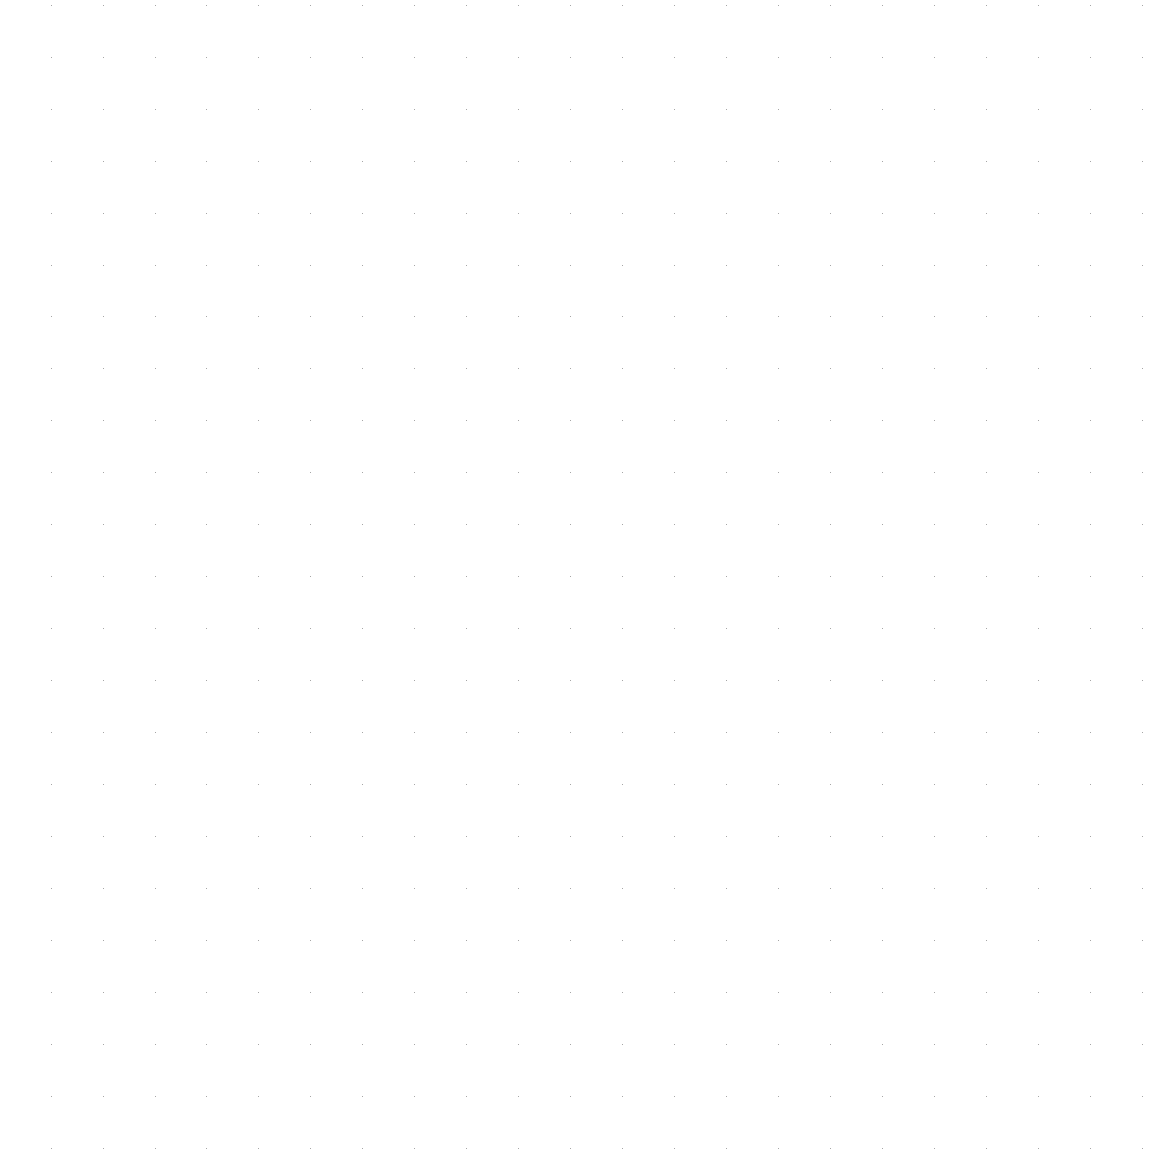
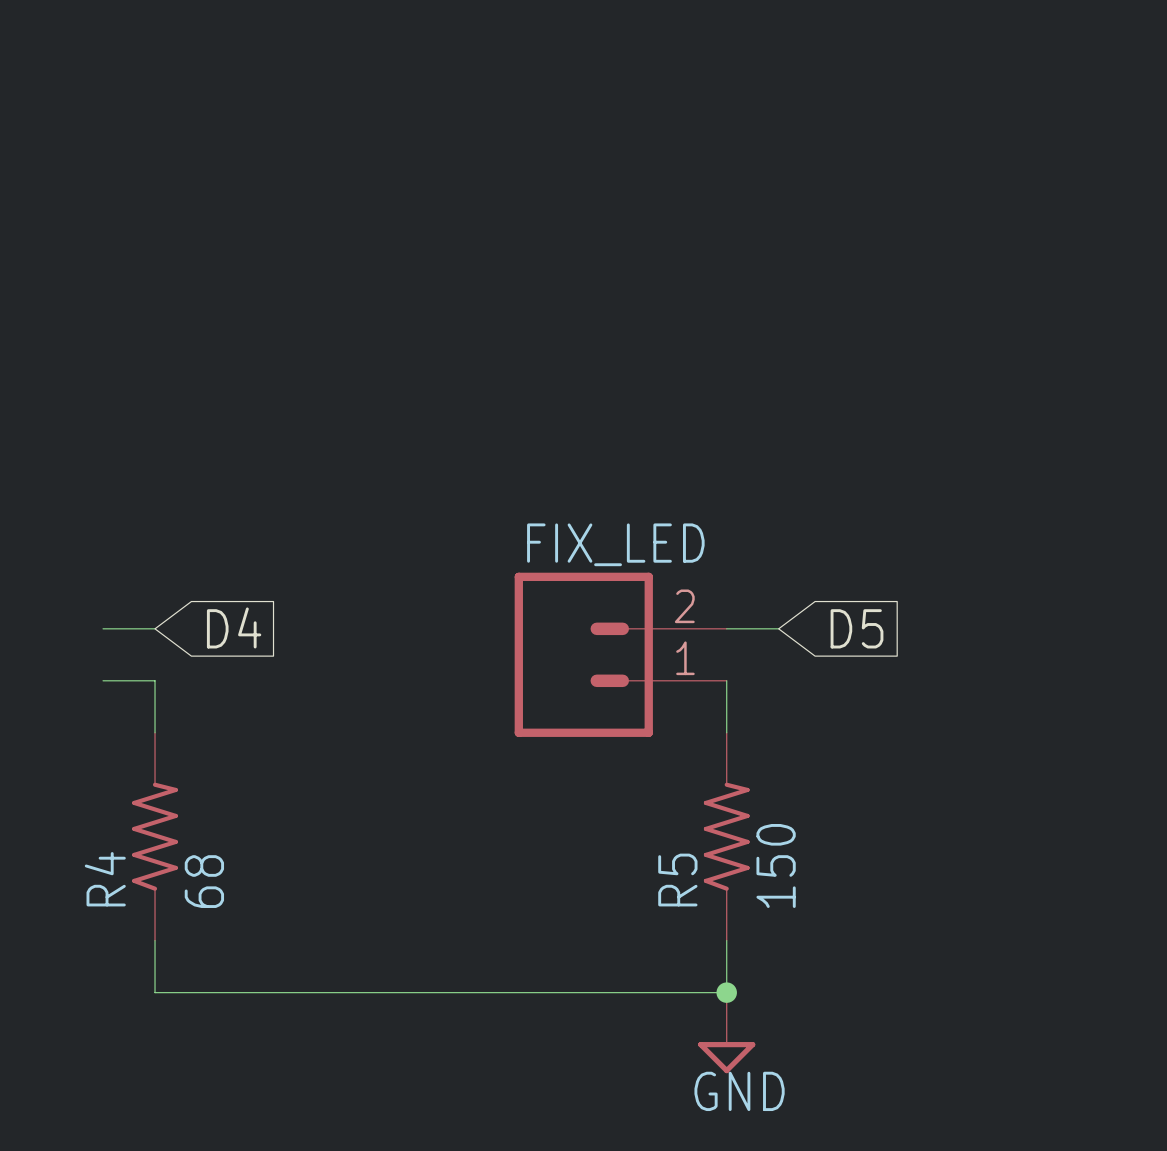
global label: none -> D4 (234, 627)
wire: none -> (103, 628) (155, 628)
wire: none -> (726, 628) (778, 628)
global label: none -> D5 (857, 628)
FIX_LED: none -> (620, 654)
wire: none -> (103, 680) (155, 680) (155, 732)
wire: none -> (726, 680) (726, 732)
R4: none -> 68 (155, 836)
R5: none -> 150 (726, 836)
wire: none -> (155, 940) (155, 992) (726, 992) (726, 940)
junction: none -> (726, 992)
power symbol: none -> GND (726, 1032)

